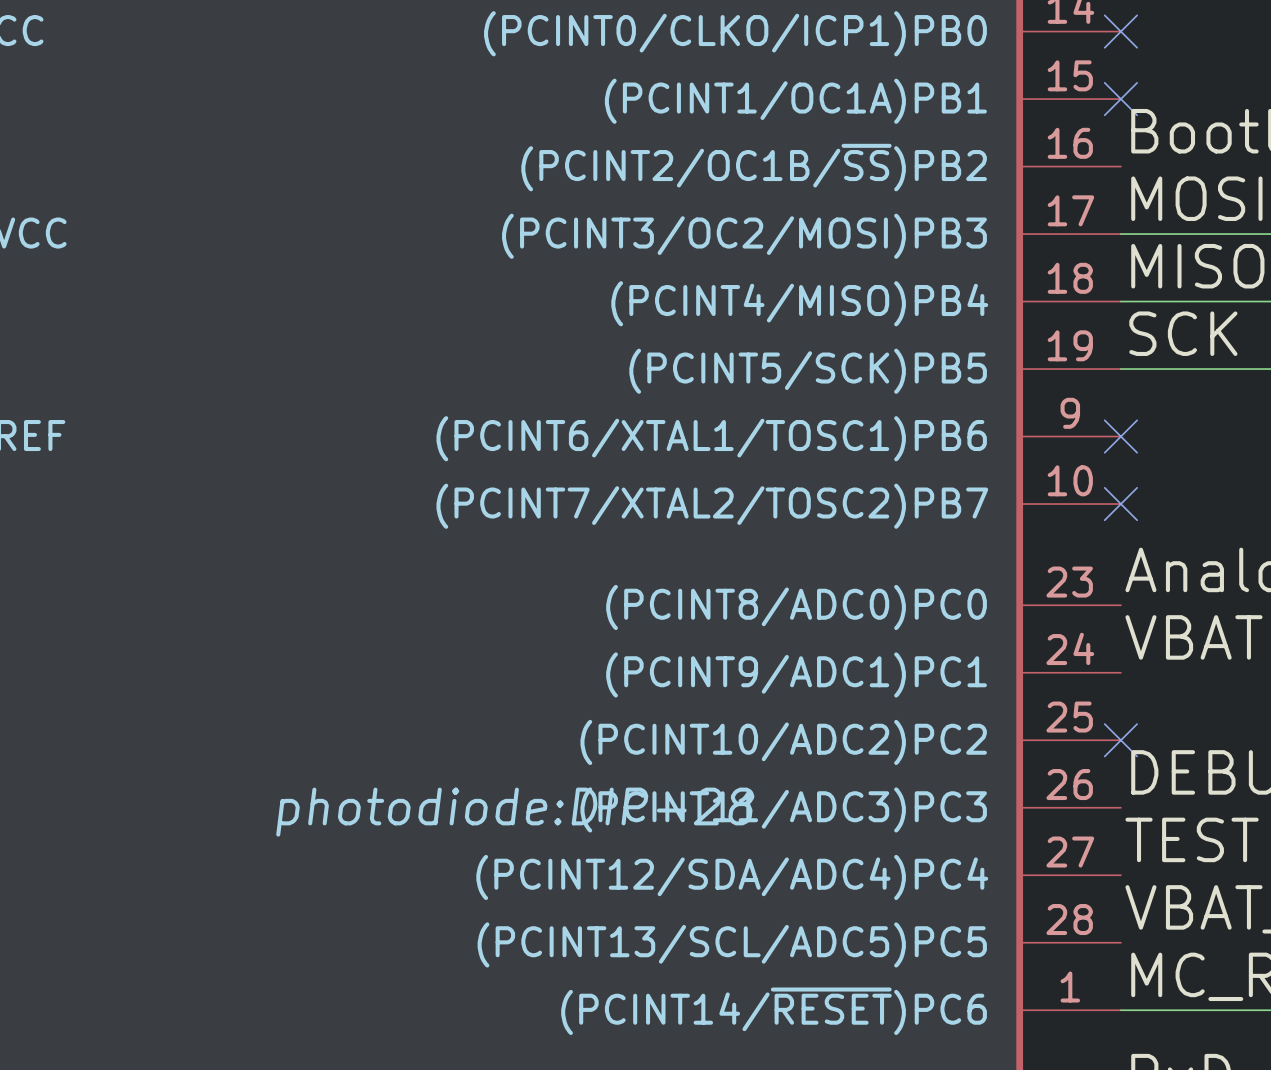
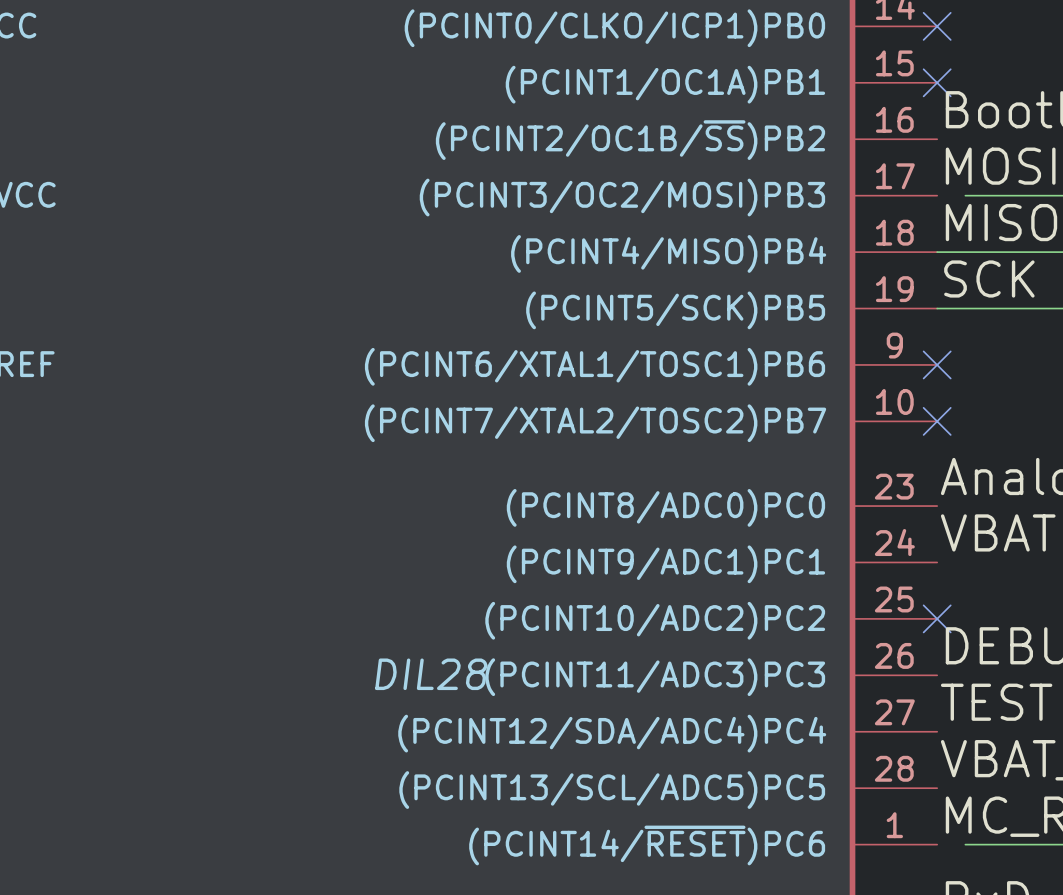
wire: (1120, 234) (1154, 234) -> none
part text: photodiode:DIP-28 (515, 812) -> DIL28 (431, 674)
wire: (1120, 1010) (1154, 1010) -> none

